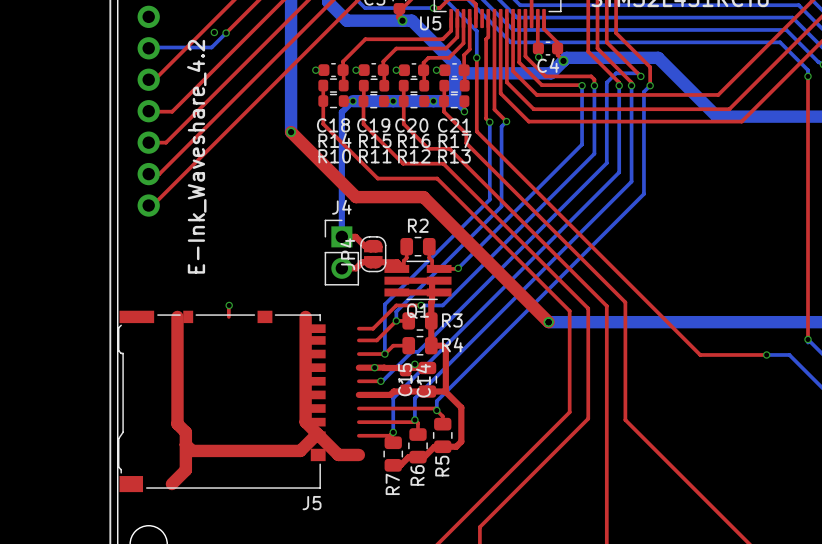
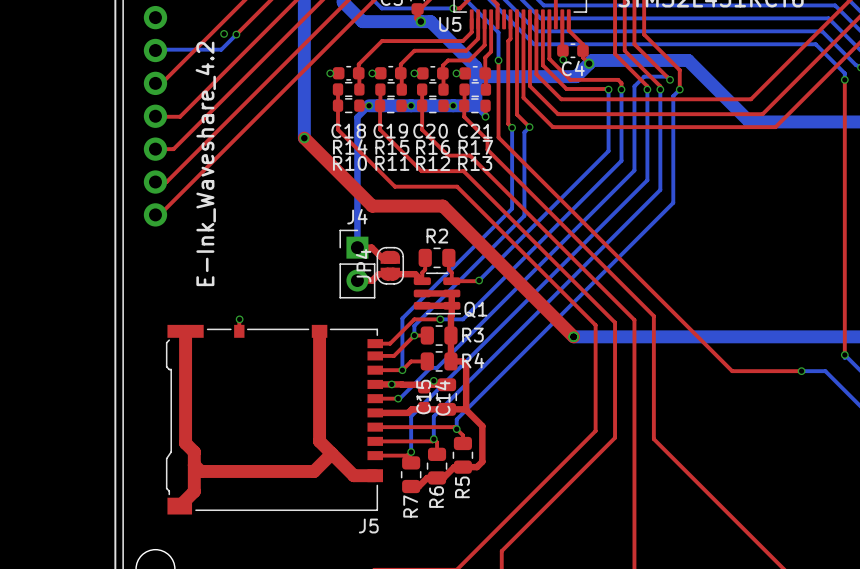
Q1 footprint: [384, 260, 452, 301] -> [413, 272, 462, 315]
Q1 name position: Q1 (418, 311) -> Q1 (475, 309)
J5 position: (221, 401) -> (274, 419)

